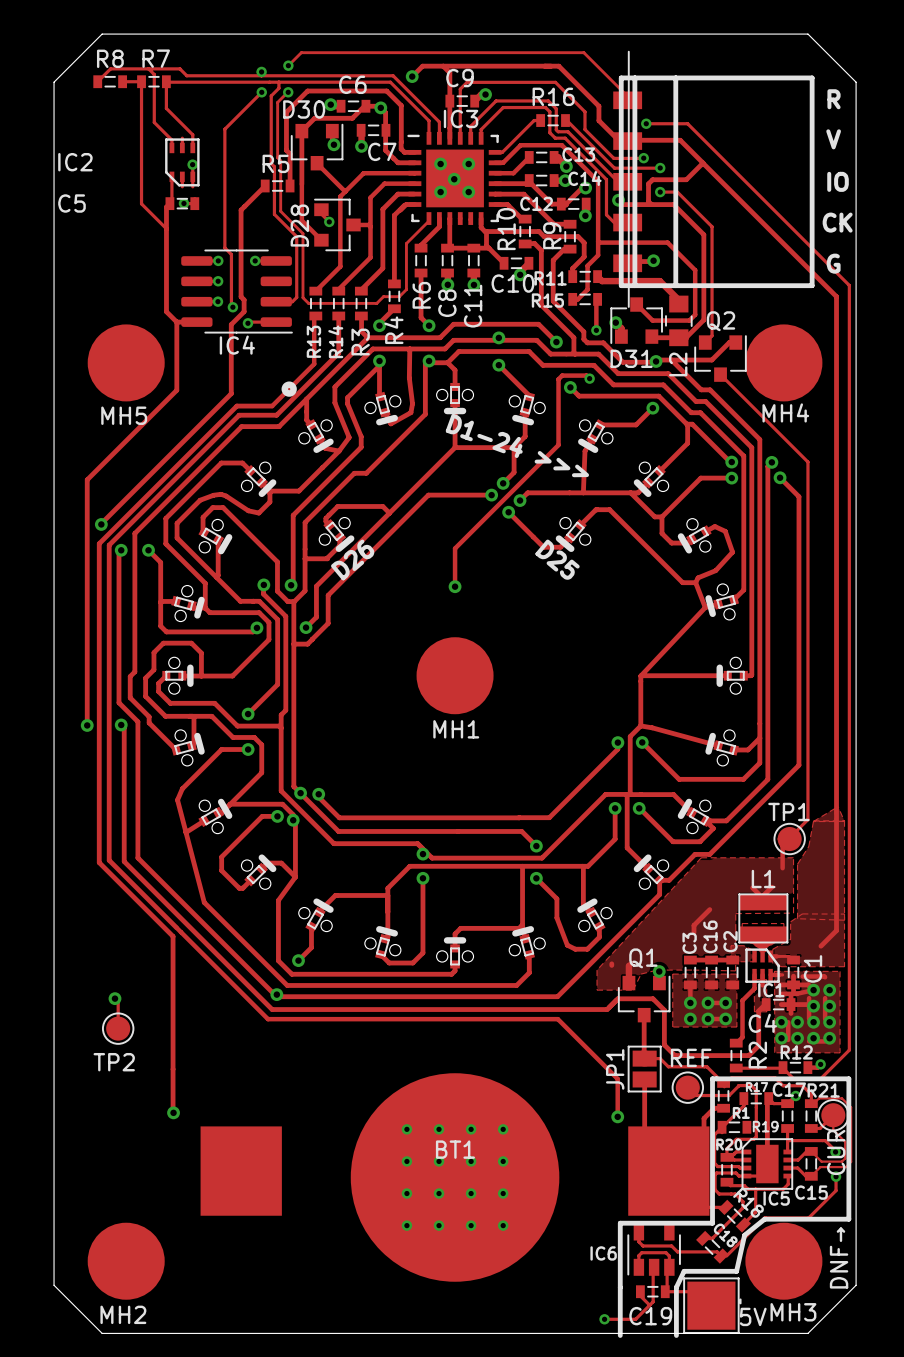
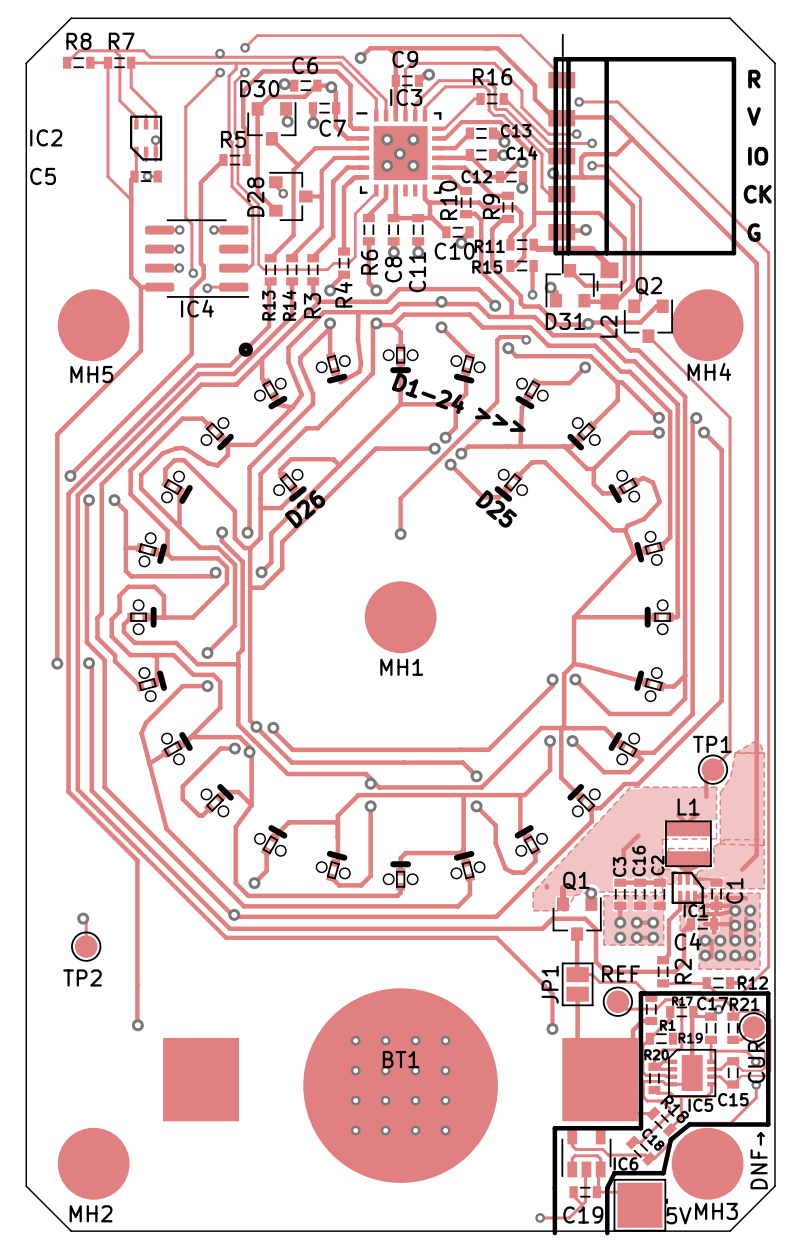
R12 name position: R12 (796, 1052) -> R12 (752, 983)
IC6 name position: IC6 (603, 1253) -> IC6 (625, 1163)

